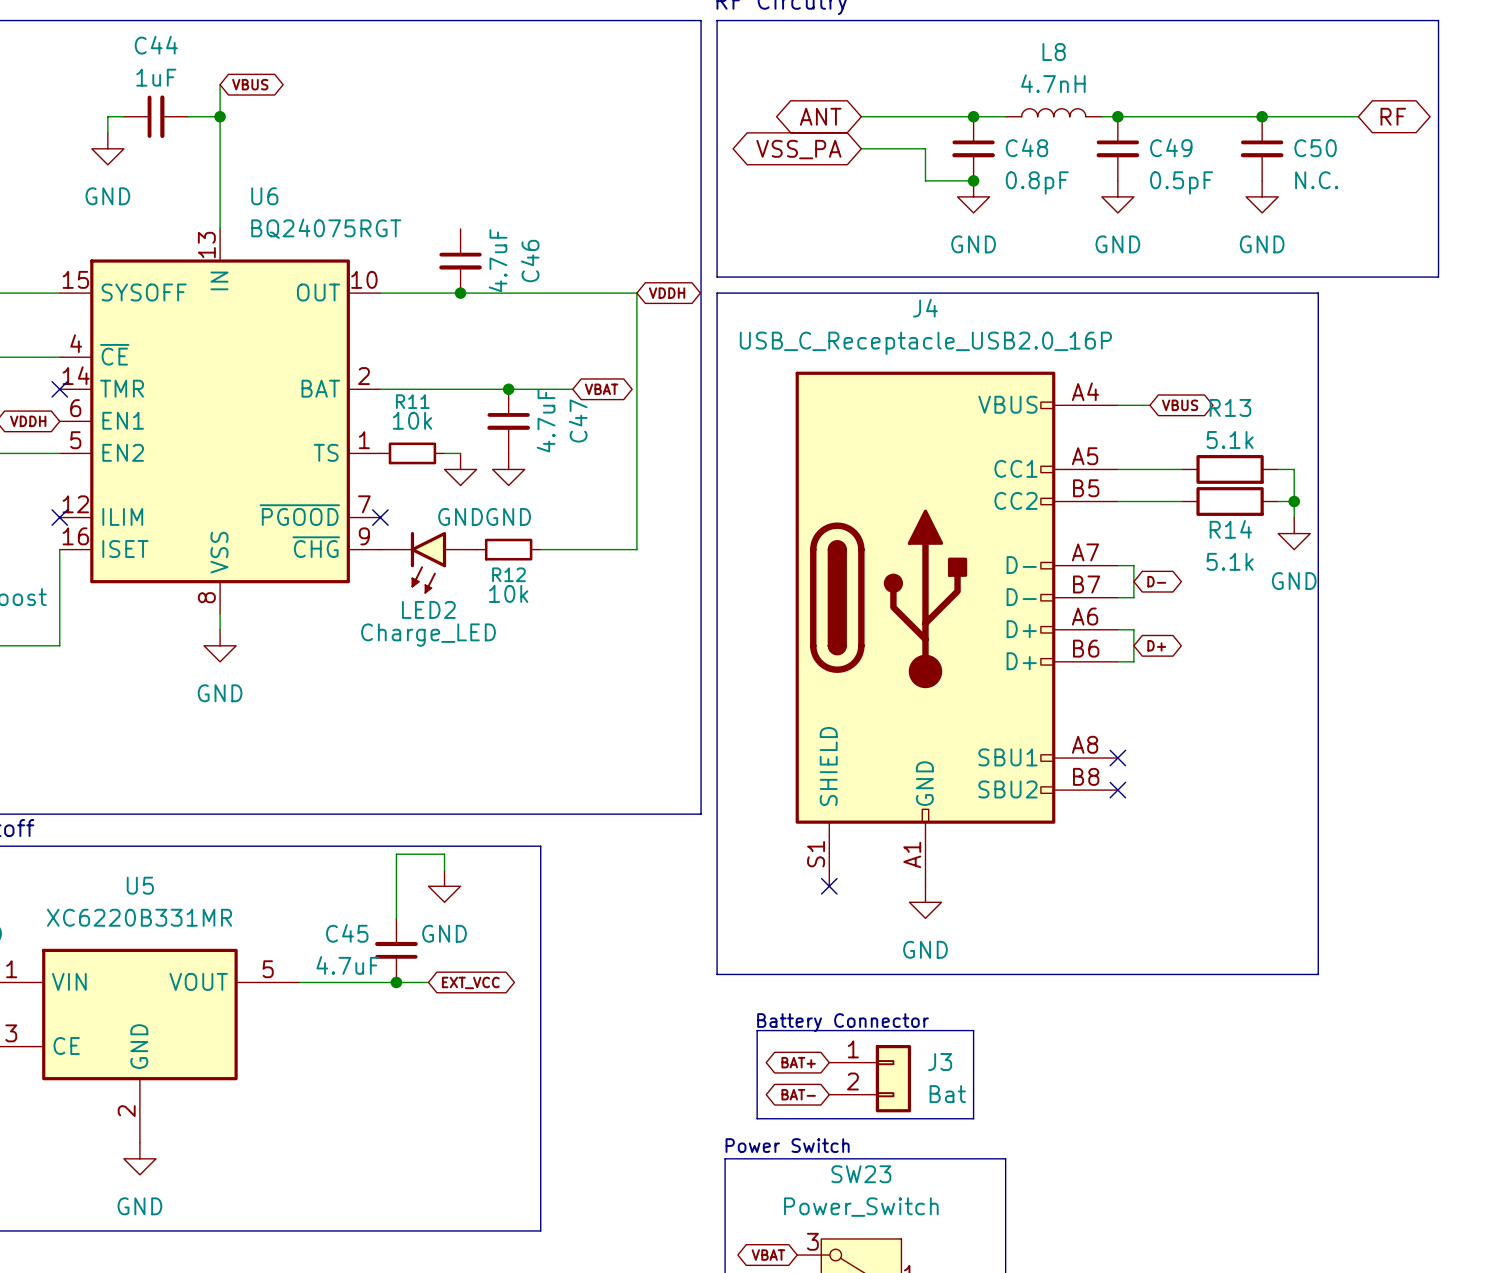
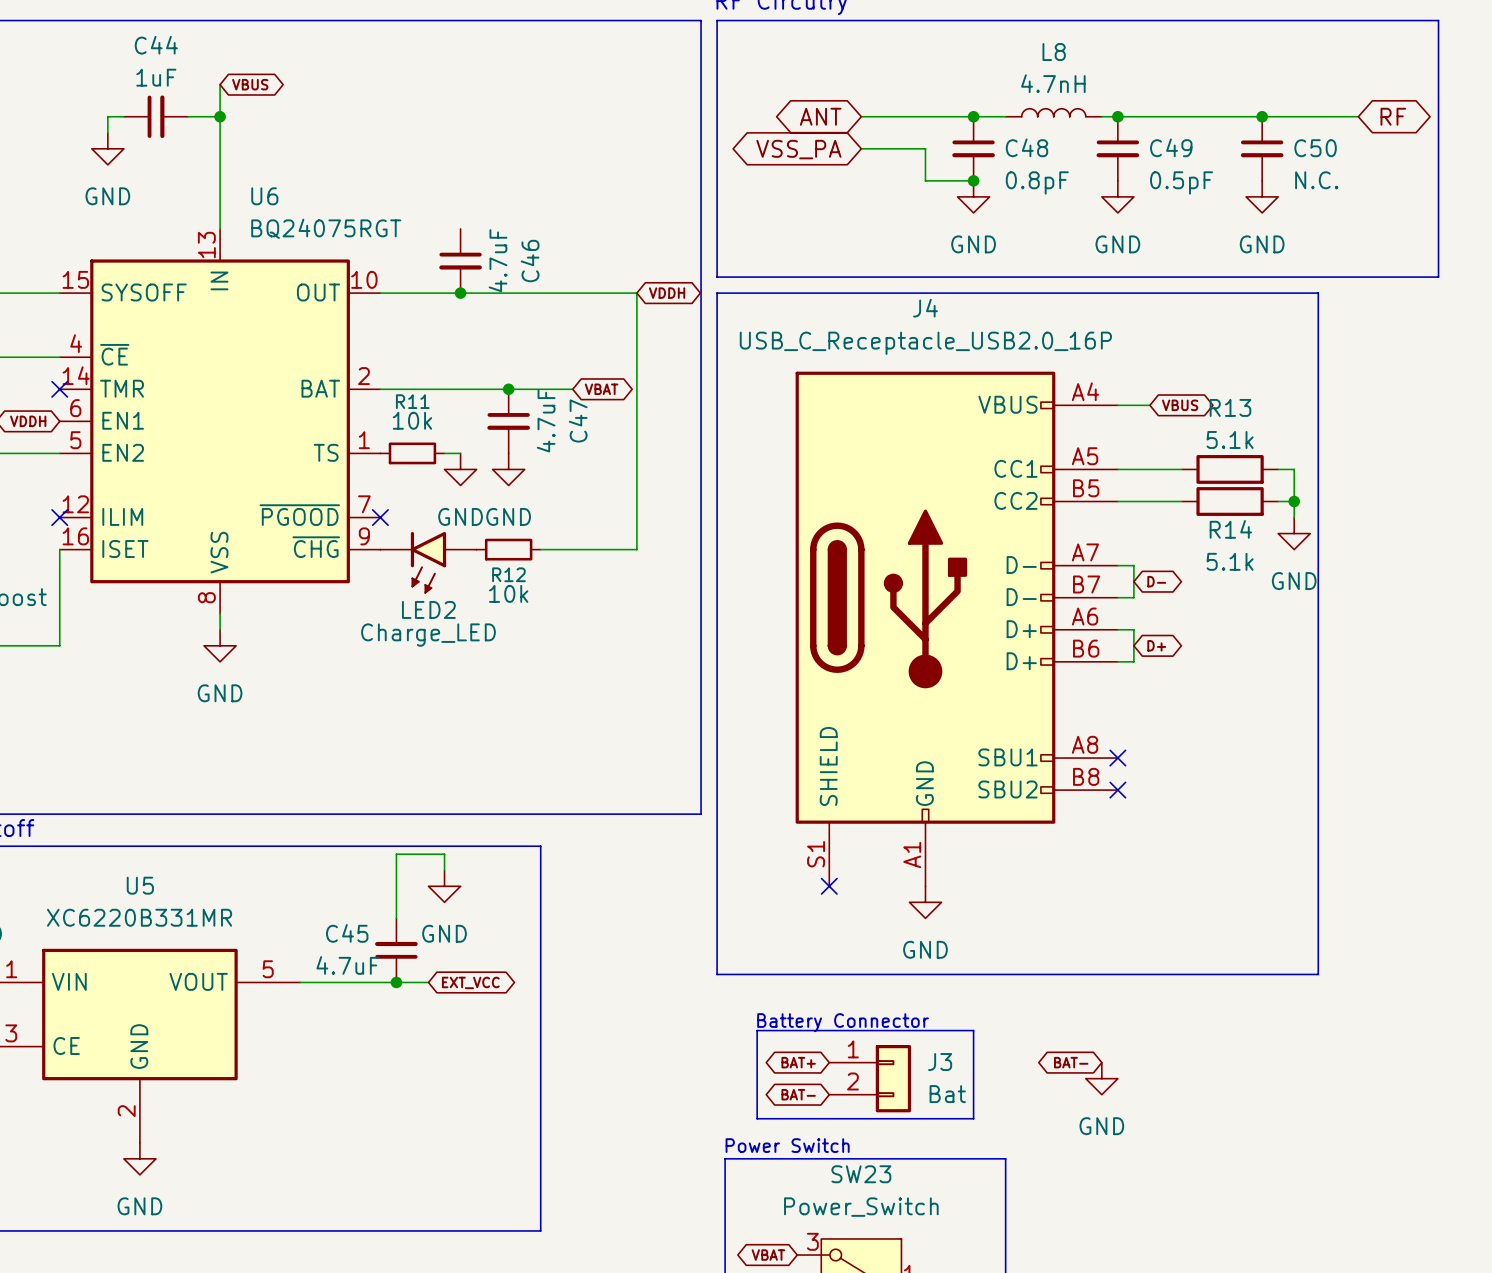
global label: none -> BAT- (1071, 1062)
power symbol: none -> GND (1101, 1078)

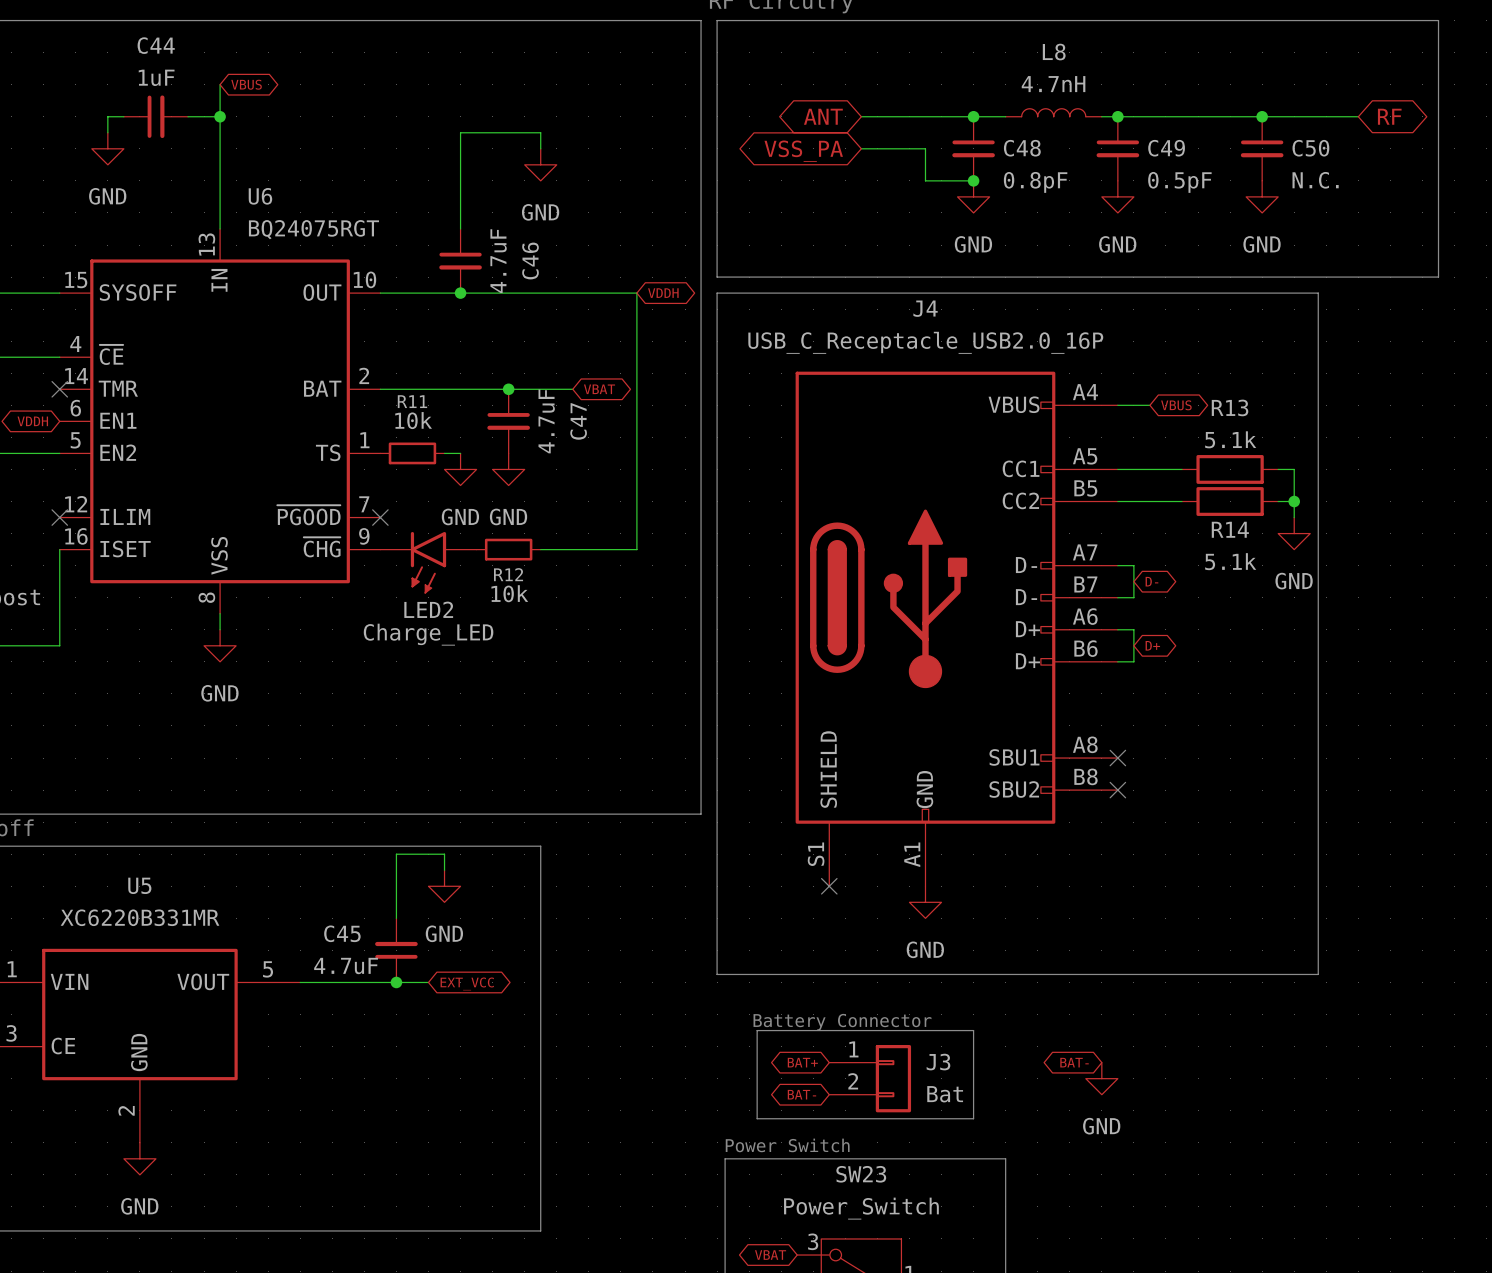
wire: none -> (540, 148) (540, 132) (460, 132) (460, 228)
power symbol: none -> GND (540, 164)

